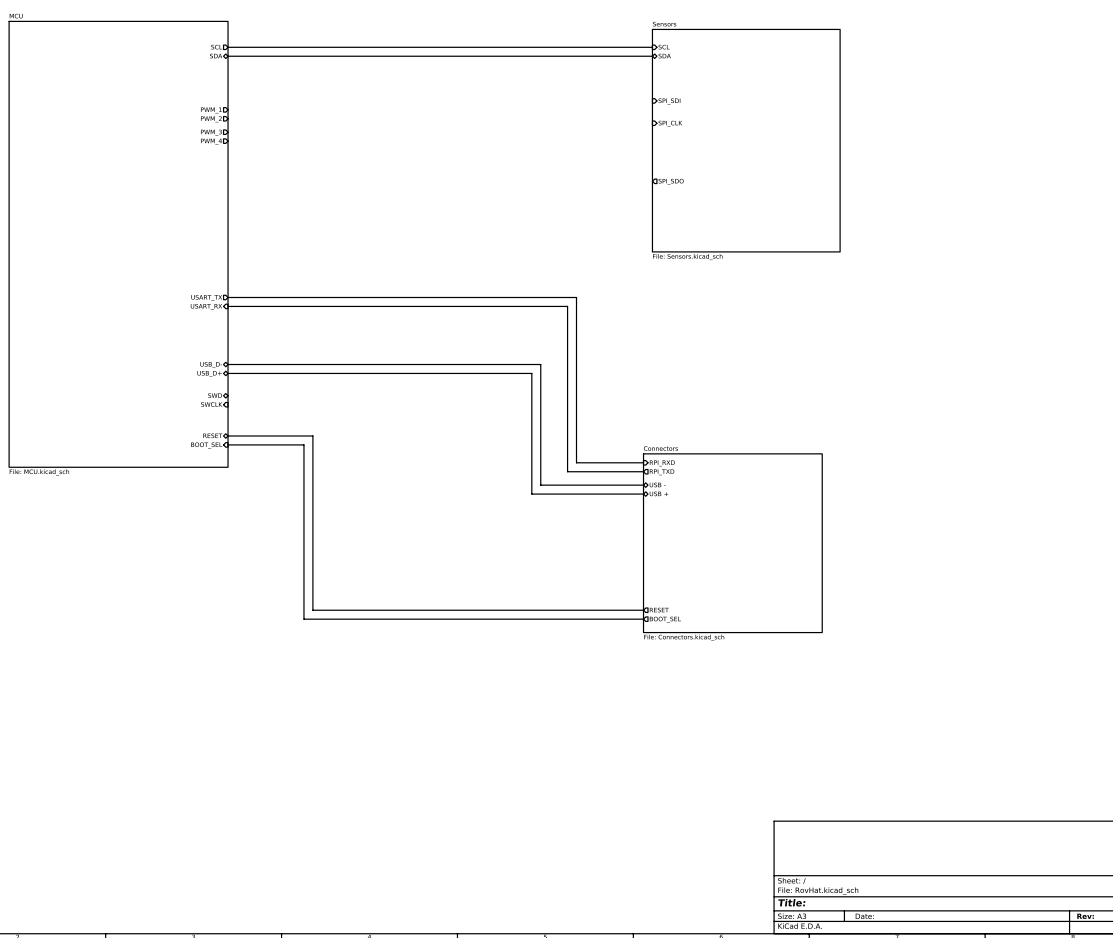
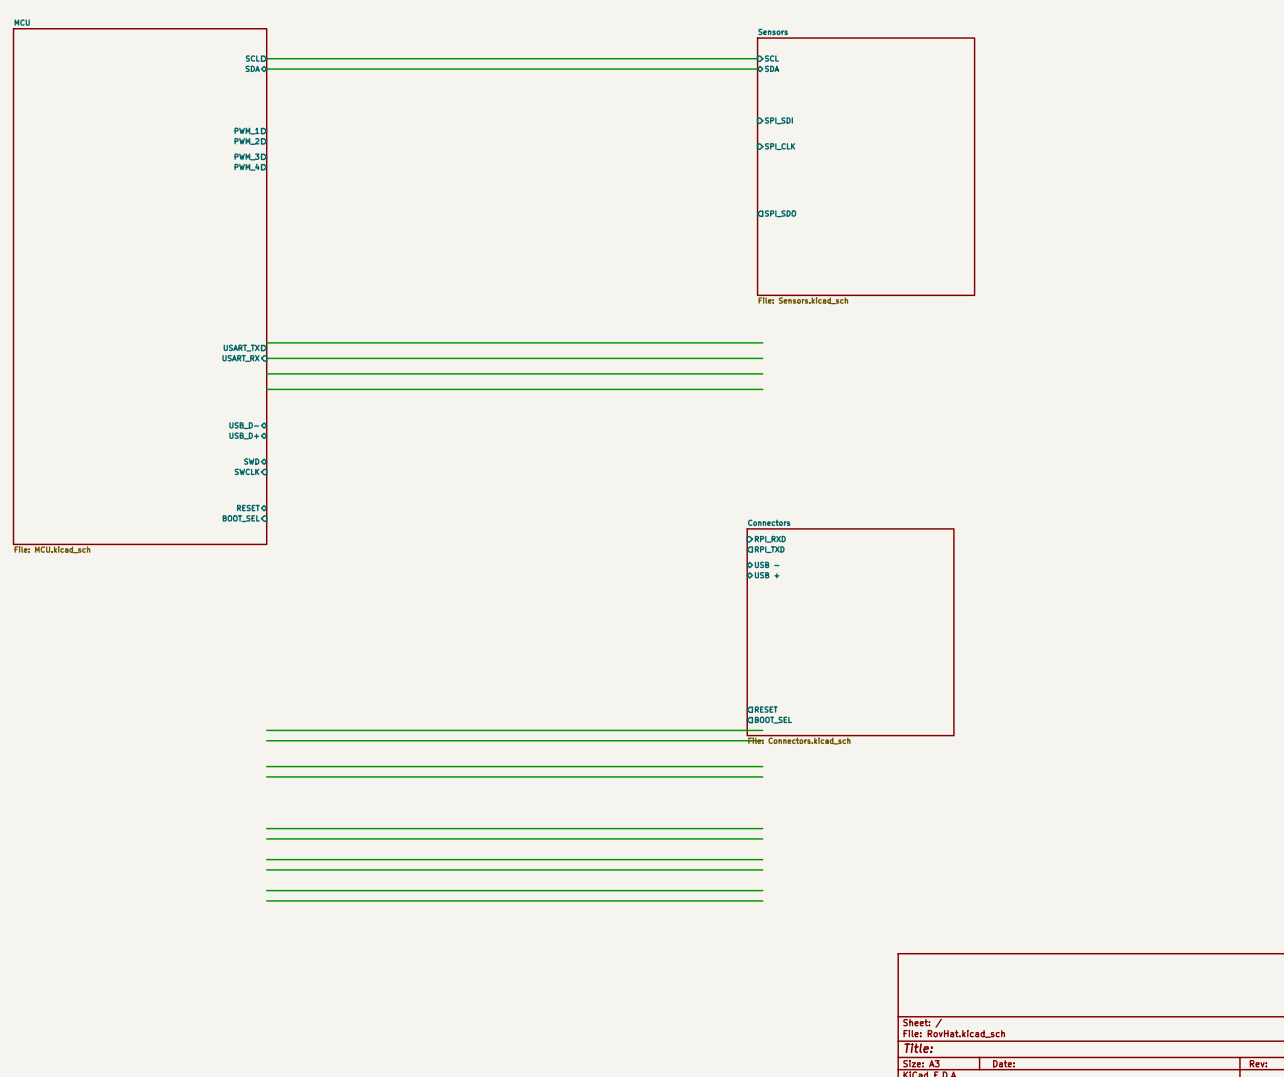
wire: none -> (266, 342) (762, 342)
wire: (228, 297) (576, 297) (576, 462) (643, 462) -> none
wire: (567, 306) (567, 471) (643, 471) -> (659, 358) (762, 358)
wire: none -> (266, 373) (762, 373)
wire: none -> (266, 389) (762, 389)
wire: (228, 364) (540, 364) (540, 485) (643, 485) -> none
wire: (228, 373) (531, 373) (531, 494) (643, 494) -> none
wire: (228, 435) (312, 435) (312, 610) (643, 610) -> none
wire: (228, 444) (303, 444) (303, 619) (643, 619) -> none
wire: none -> (266, 730) (762, 730)
wire: none -> (266, 740) (762, 740)
wire: none -> (266, 766) (762, 766)
wire: none -> (266, 776) (762, 776)
wire: none -> (266, 828) (762, 828)
wire: none -> (266, 838) (762, 838)
wire: none -> (266, 859) (762, 859)
wire: none -> (266, 869) (762, 869)
wire: none -> (266, 890) (762, 890)
wire: none -> (266, 900) (762, 900)

